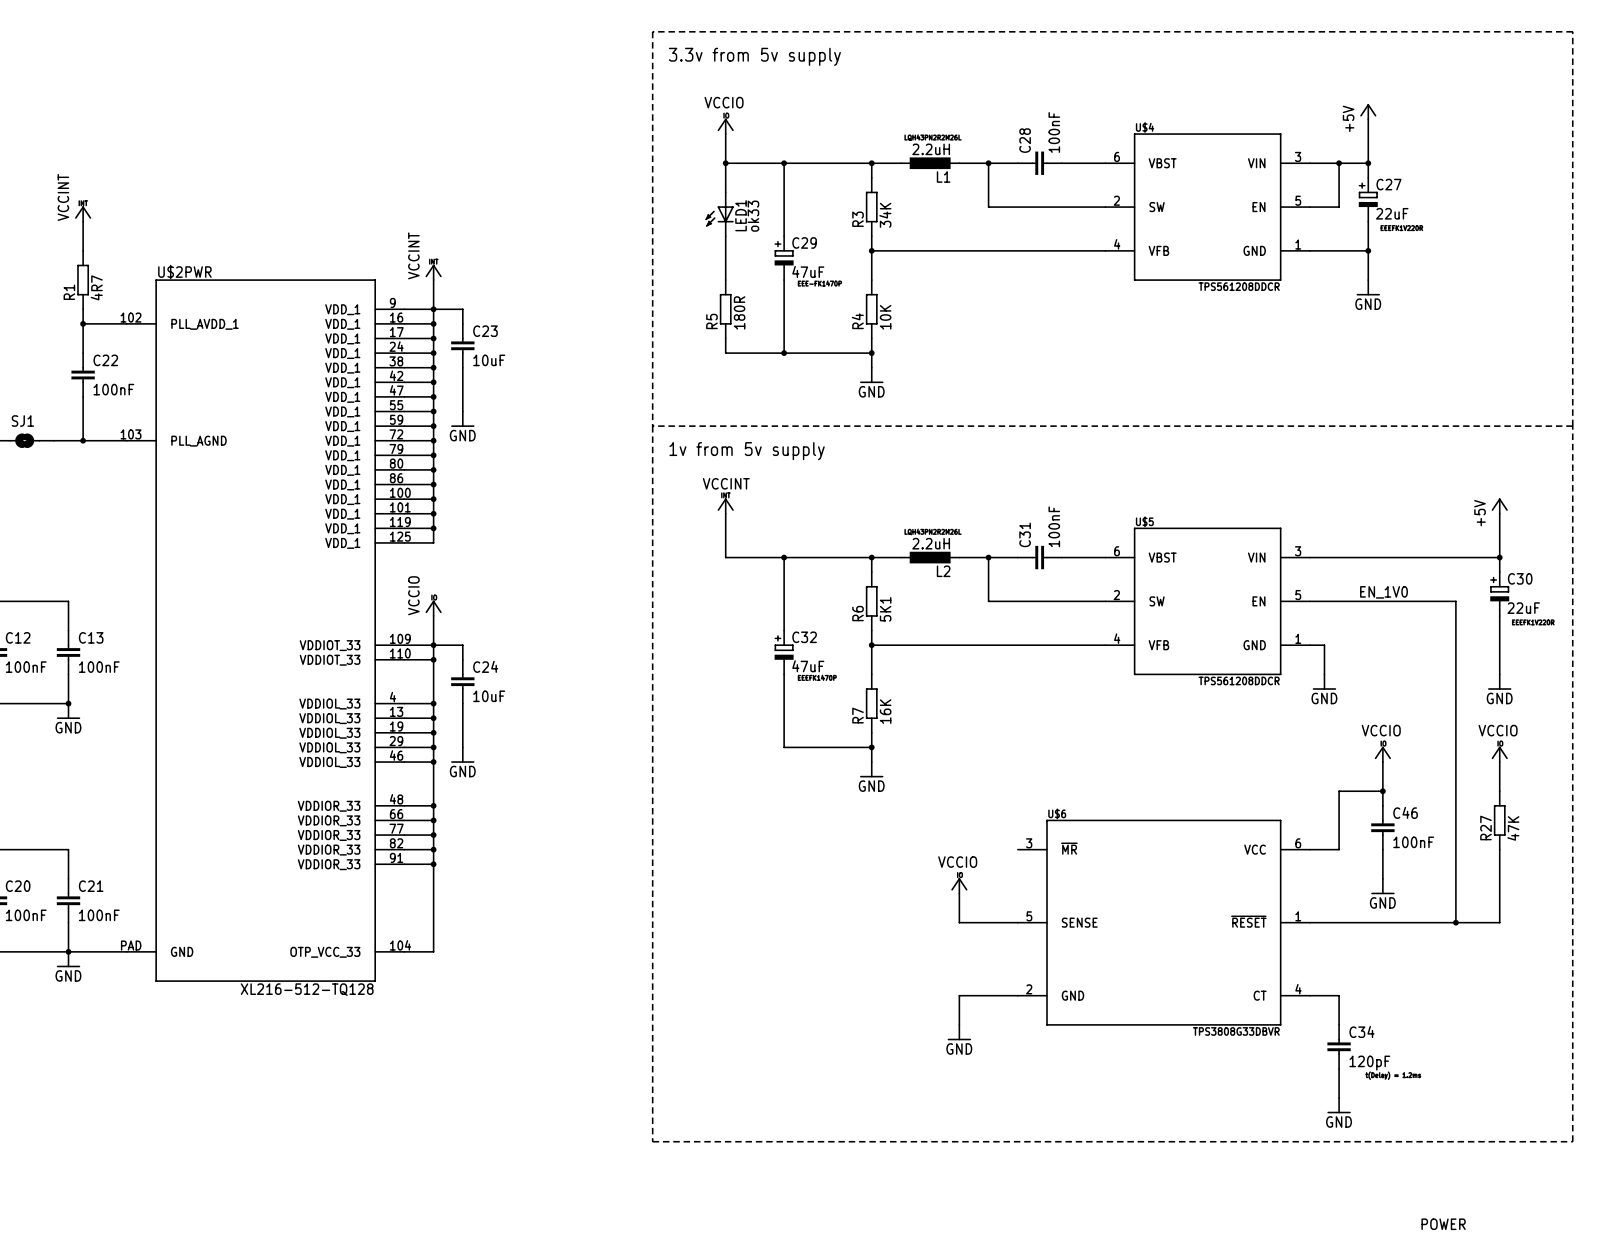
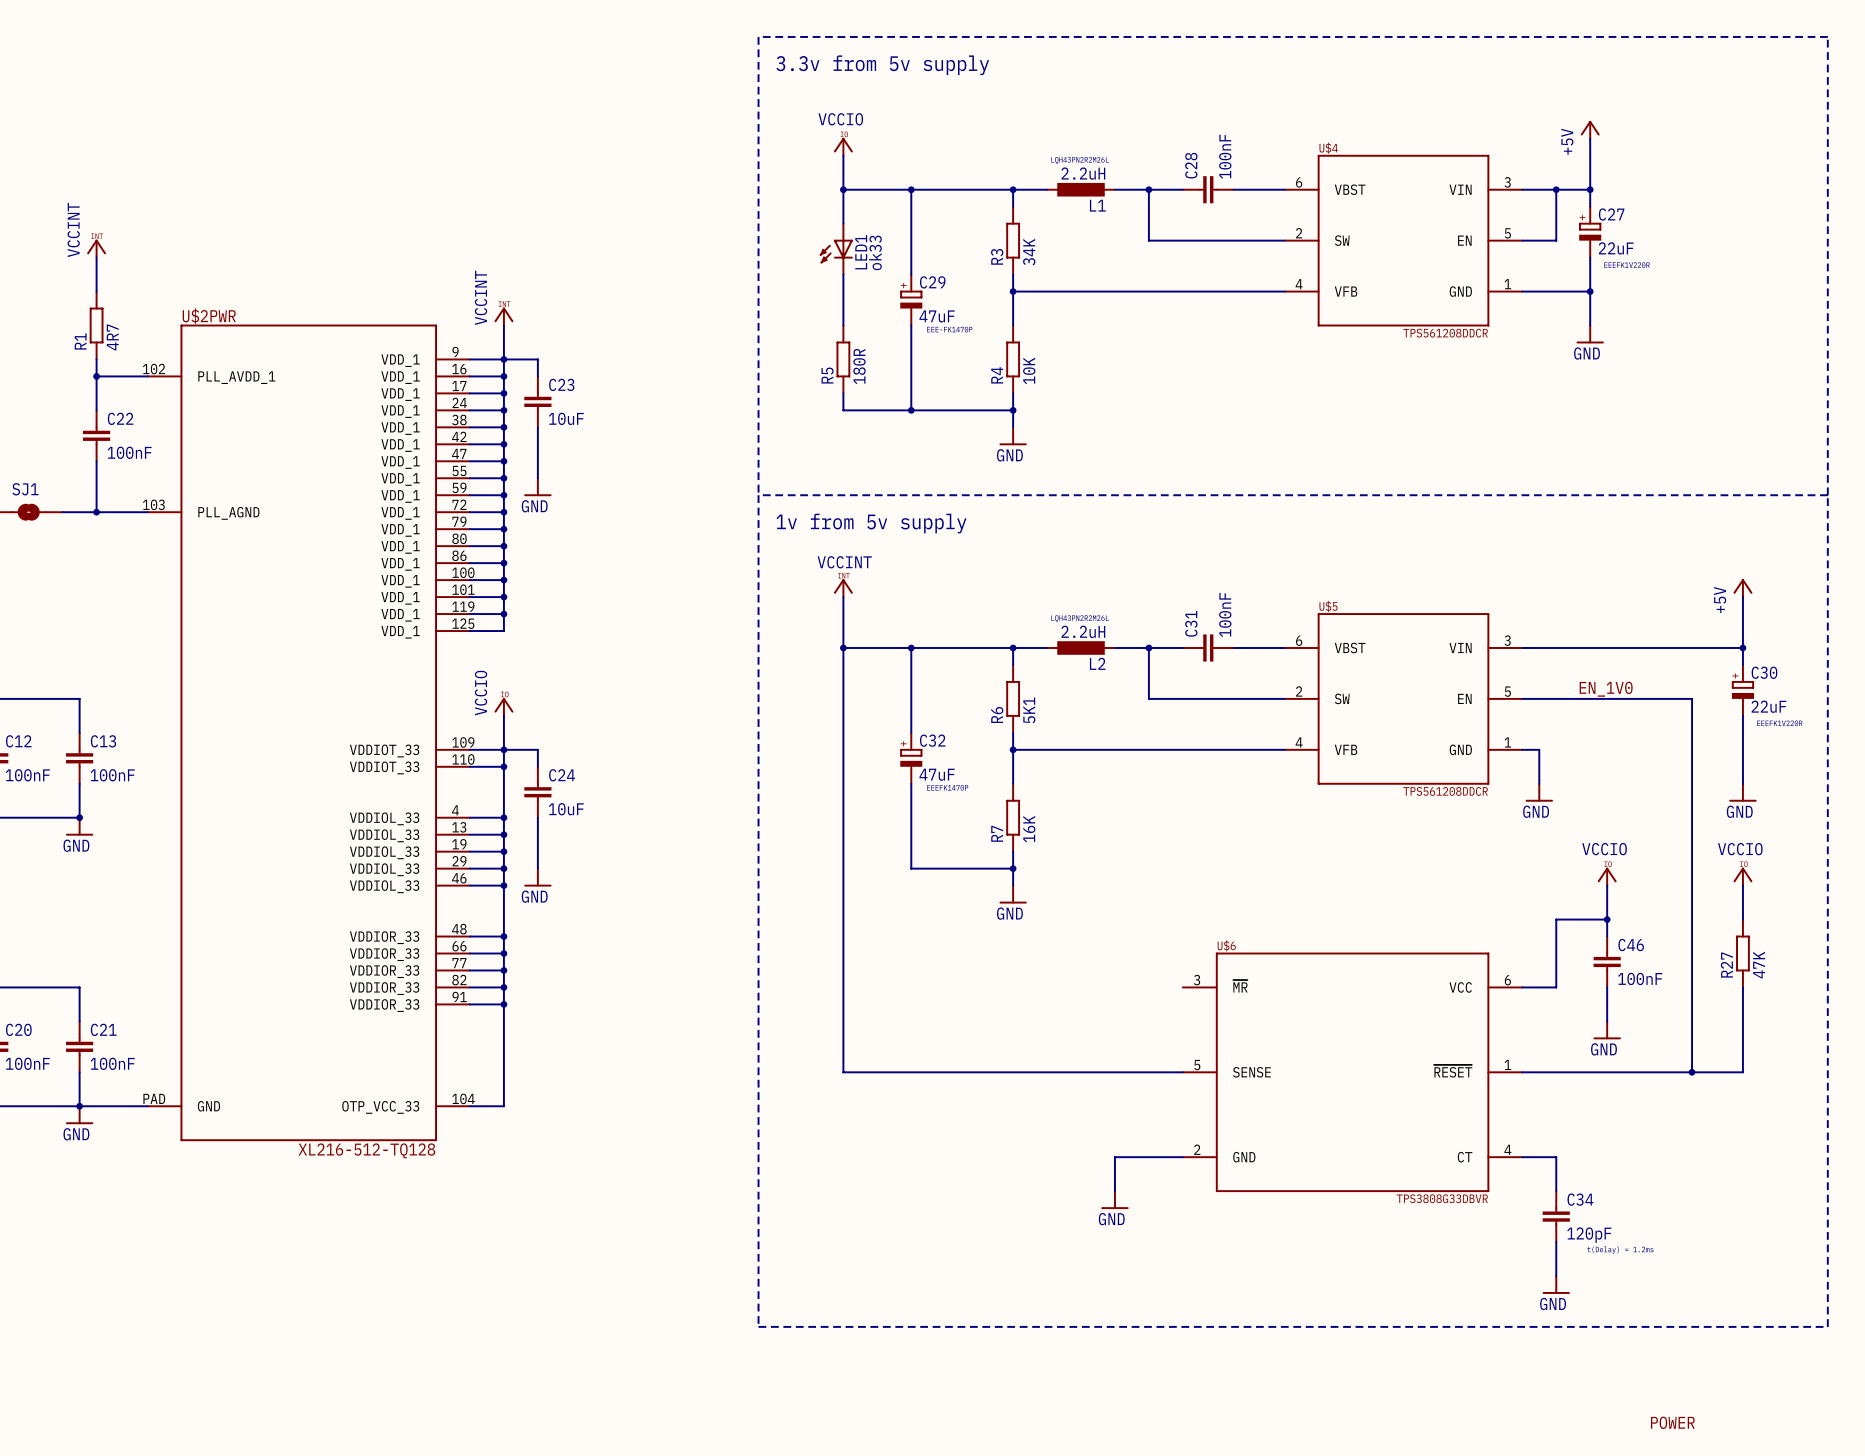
junction: none -> (843, 647)
power symbol: VCCIO (959, 885) -> none
wire: (959, 893) (959, 922) -> (843, 647) (843, 1072) (1114, 1072)

